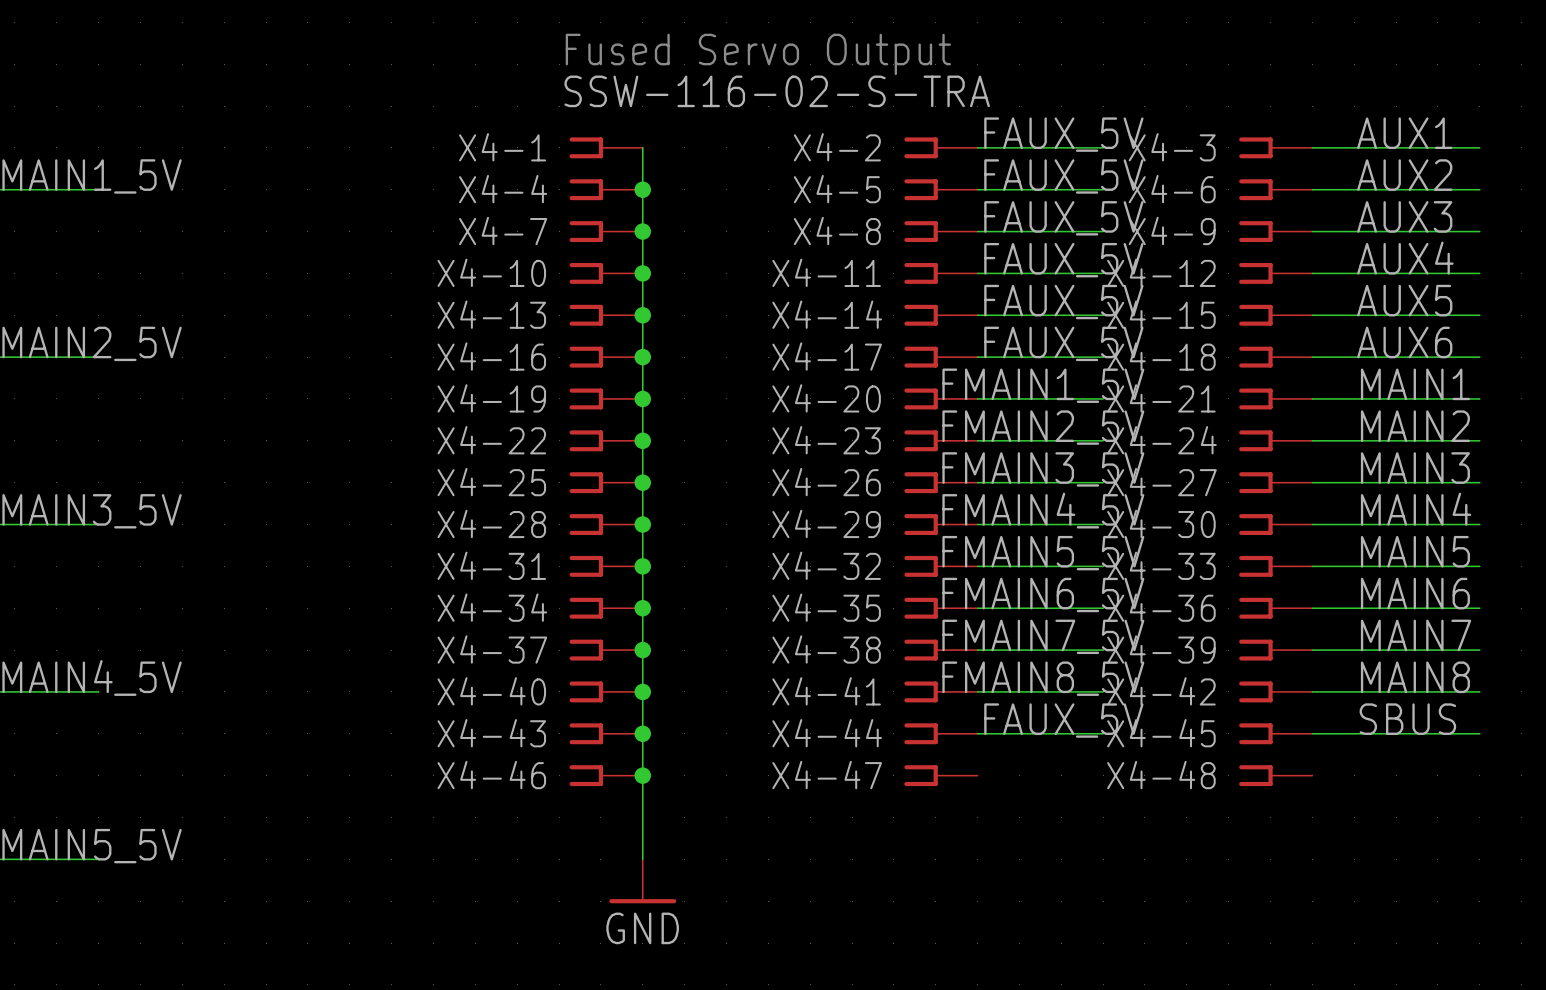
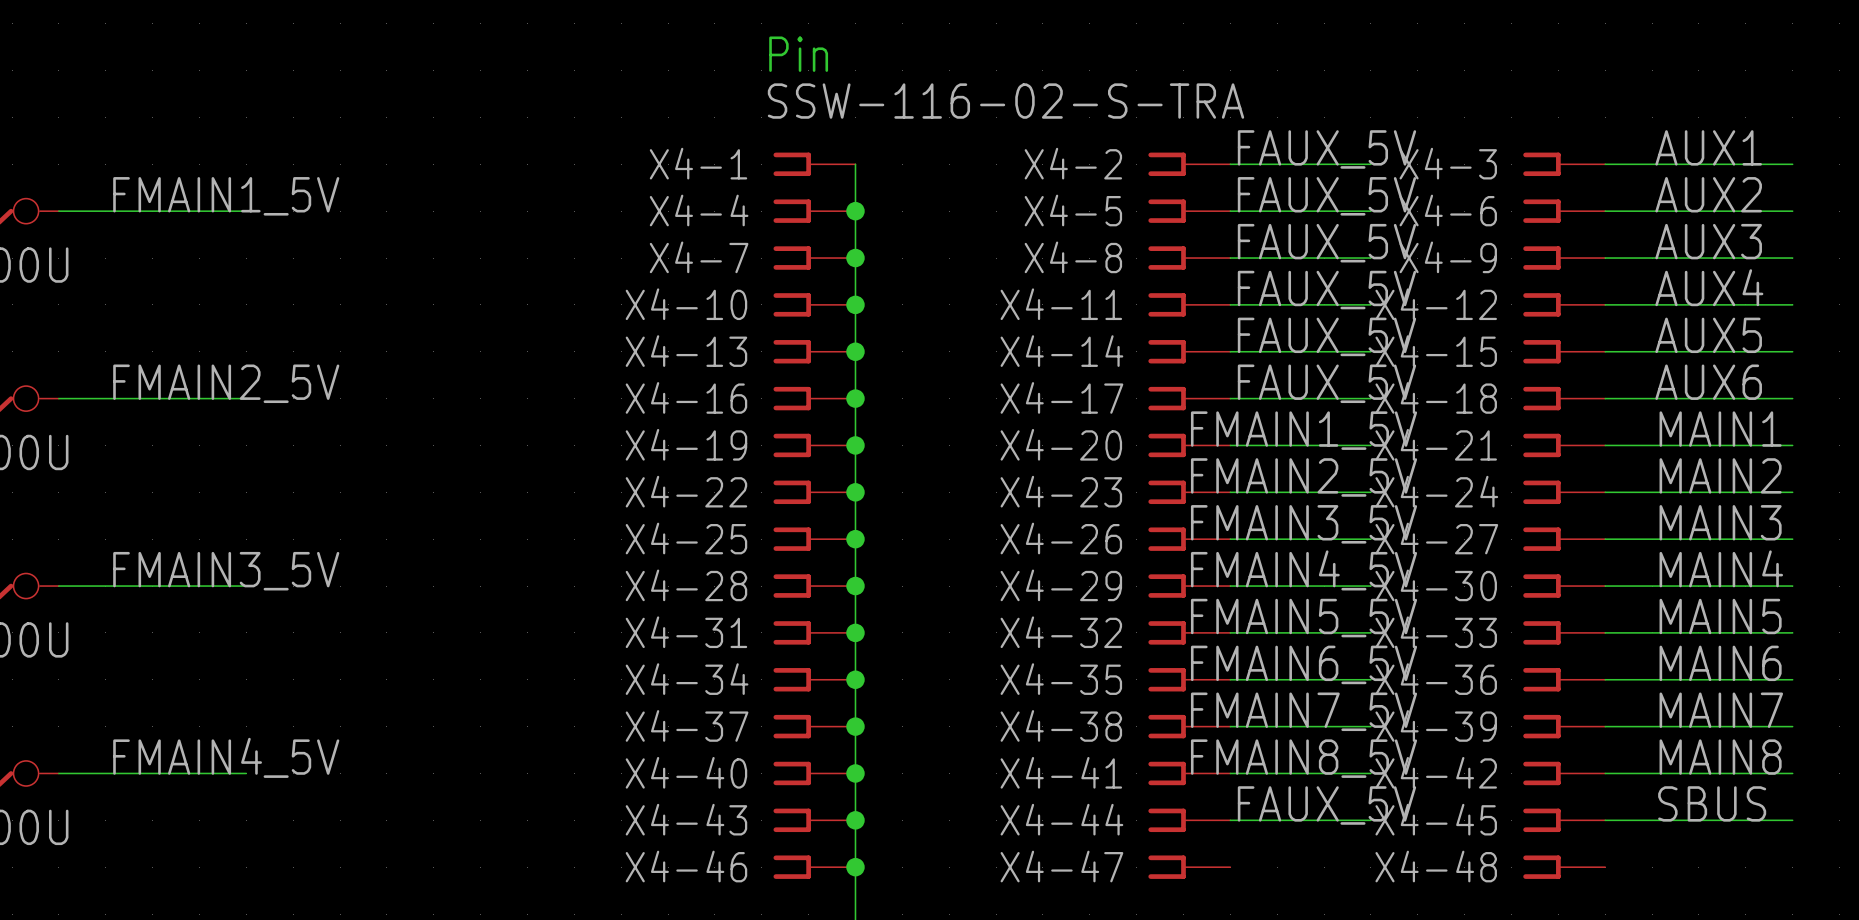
text: Fused Servo Output (758, 54) -> Pin (798, 54)

